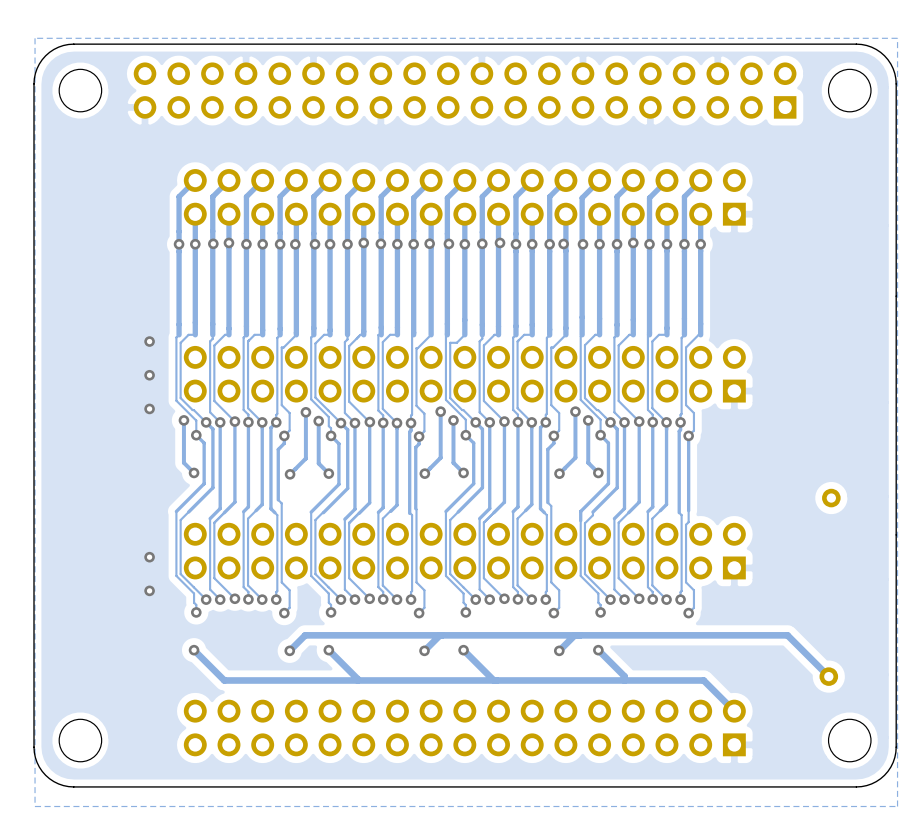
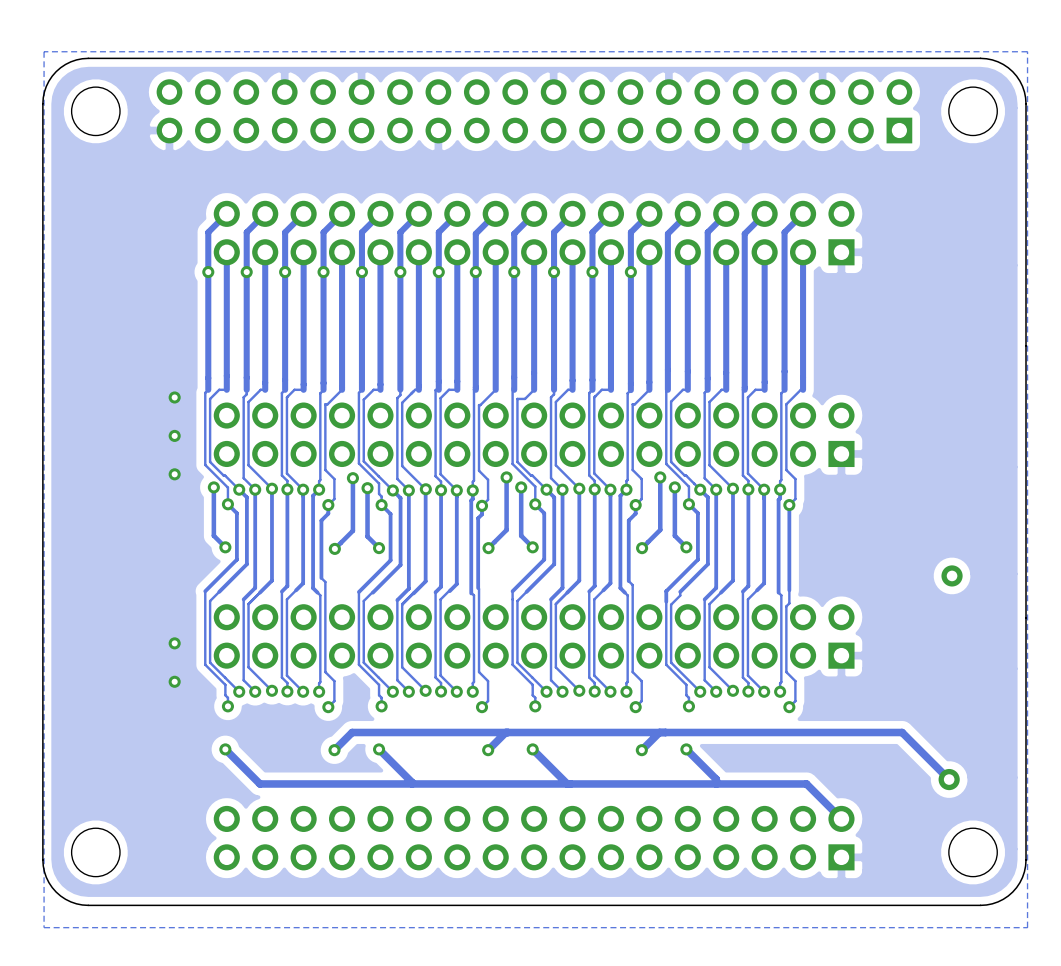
via: none -> (208, 272)
via: none -> (246, 272)
via: none -> (285, 272)
via: none -> (323, 272)
via: none -> (361, 272)
via: none -> (400, 272)
via: none -> (438, 272)
via: none -> (475, 272)
via: none -> (514, 272)
via: none -> (554, 272)
via: none -> (592, 272)
via: none -> (630, 272)
via: (228, 242) -> none
via: (363, 242) -> none
via: (500, 242) -> none
via: (633, 242) -> none
via: (213, 243) -> none
via: (380, 243) -> none
via: (429, 243) -> none
via: (448, 243) -> none
via: (482, 243) -> none
via: (563, 243) -> none
via: (179, 244) -> none
via: (195, 244) -> none
via: (246, 244) -> none
via: (262, 244) -> none
via: (280, 244) -> none
via: (295, 244) -> none
via: (315, 244) -> none
via: (330, 244) -> none
via: (347, 244) -> none
via: (397, 244) -> none
via: (413, 244) -> none
via: (464, 244) -> none
via: (515, 244) -> none
via: (532, 244) -> none
via: (549, 244) -> none
via: (583, 244) -> none
via: (599, 244) -> none
via: (617, 244) -> none
via: (649, 244) -> none
via: (666, 244) -> none
via: (684, 244) -> none
via: (700, 244) -> none

